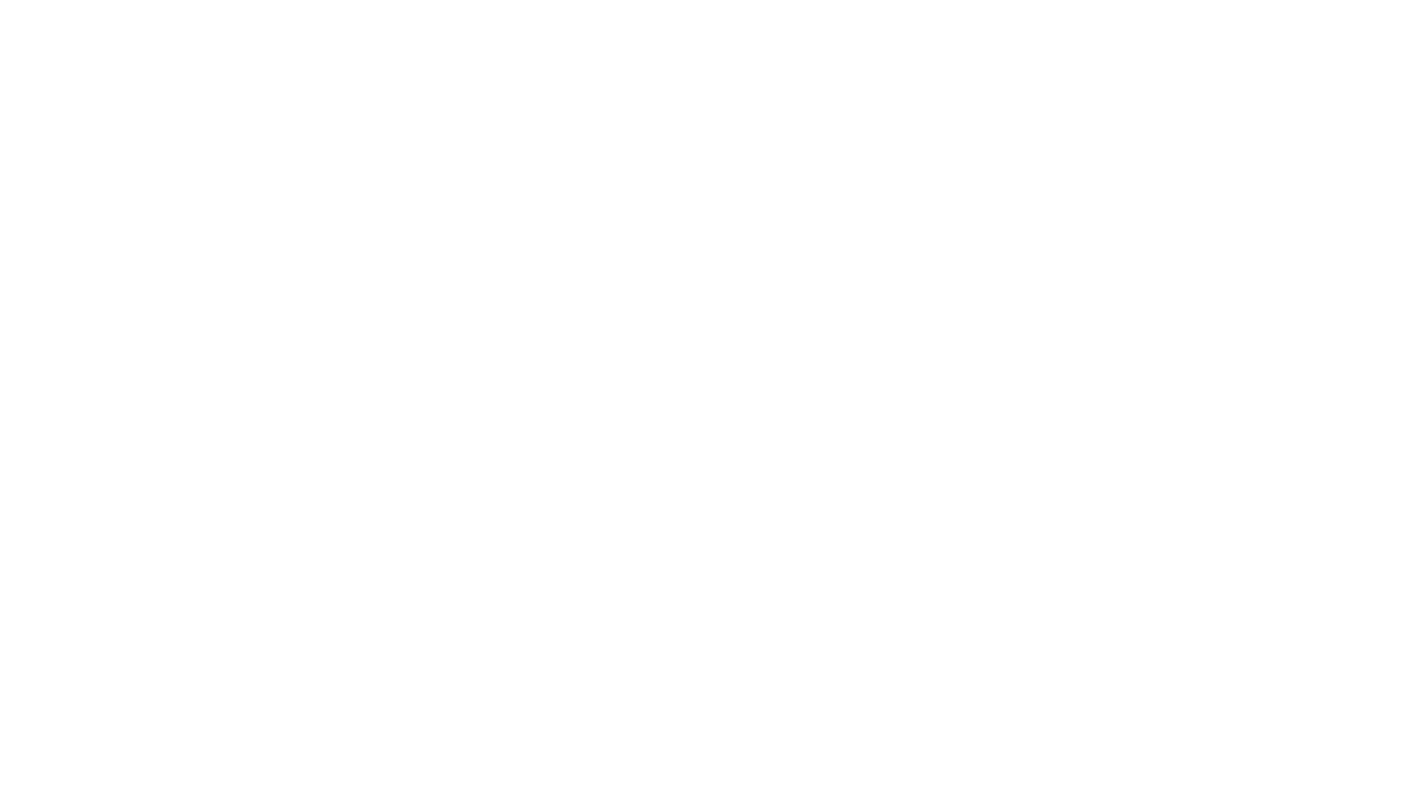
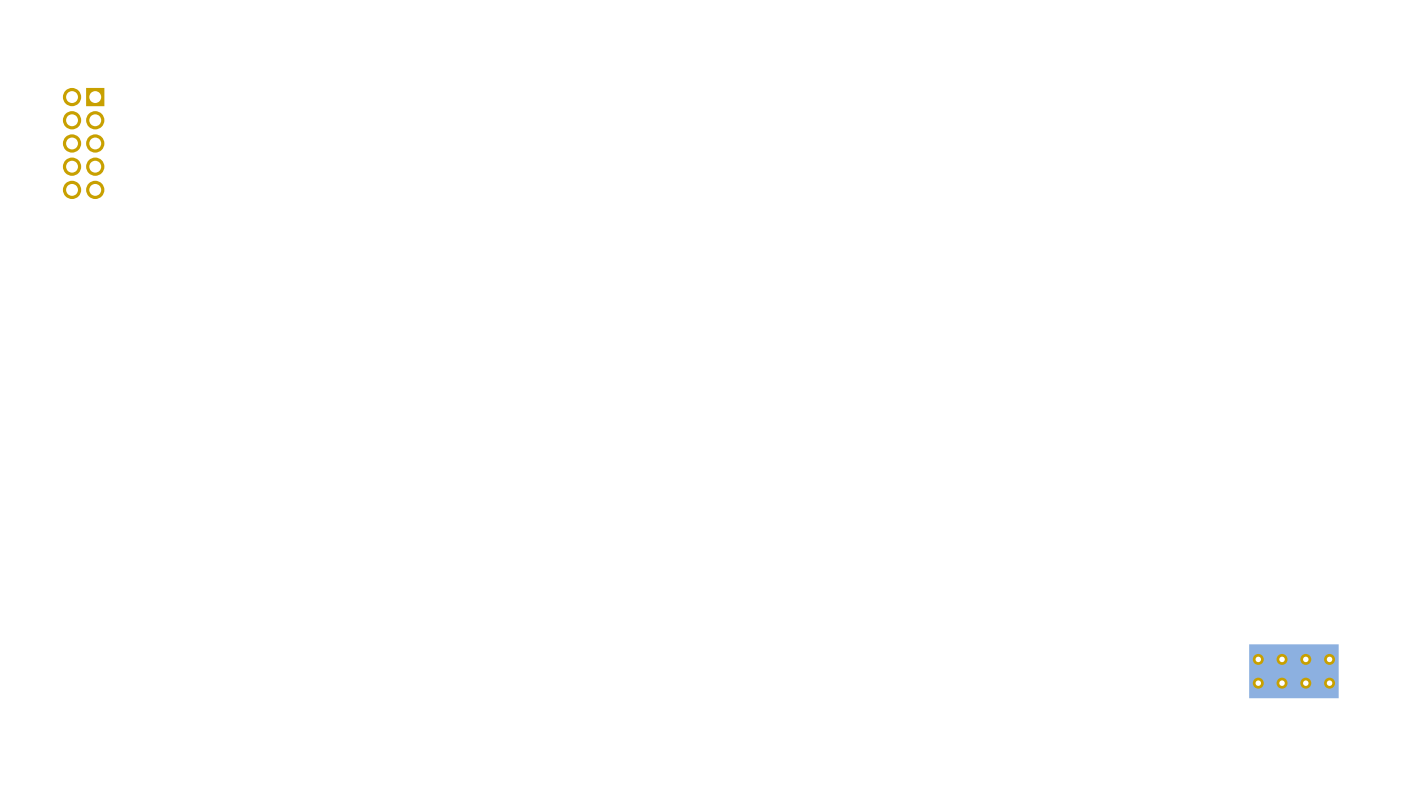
part: none -> (83, 143)
part: none -> (1293, 671)

